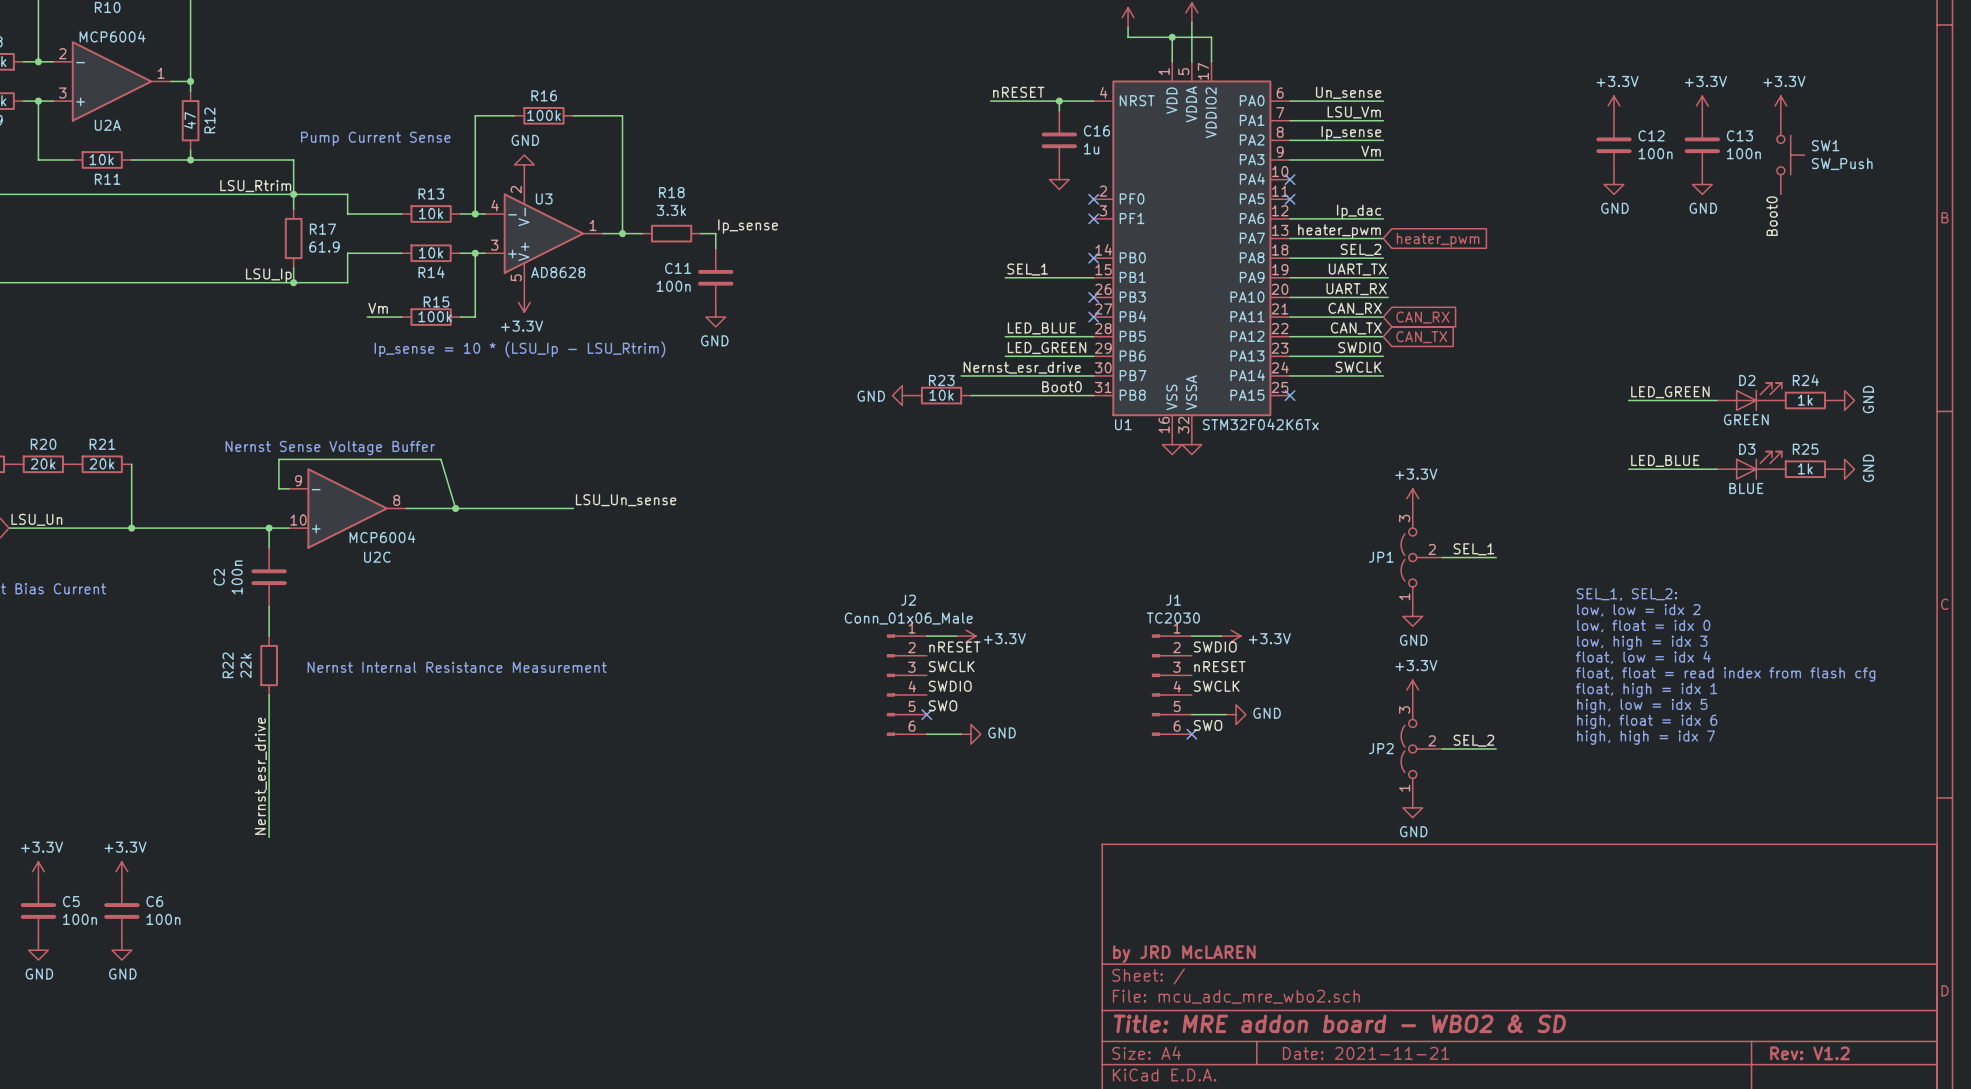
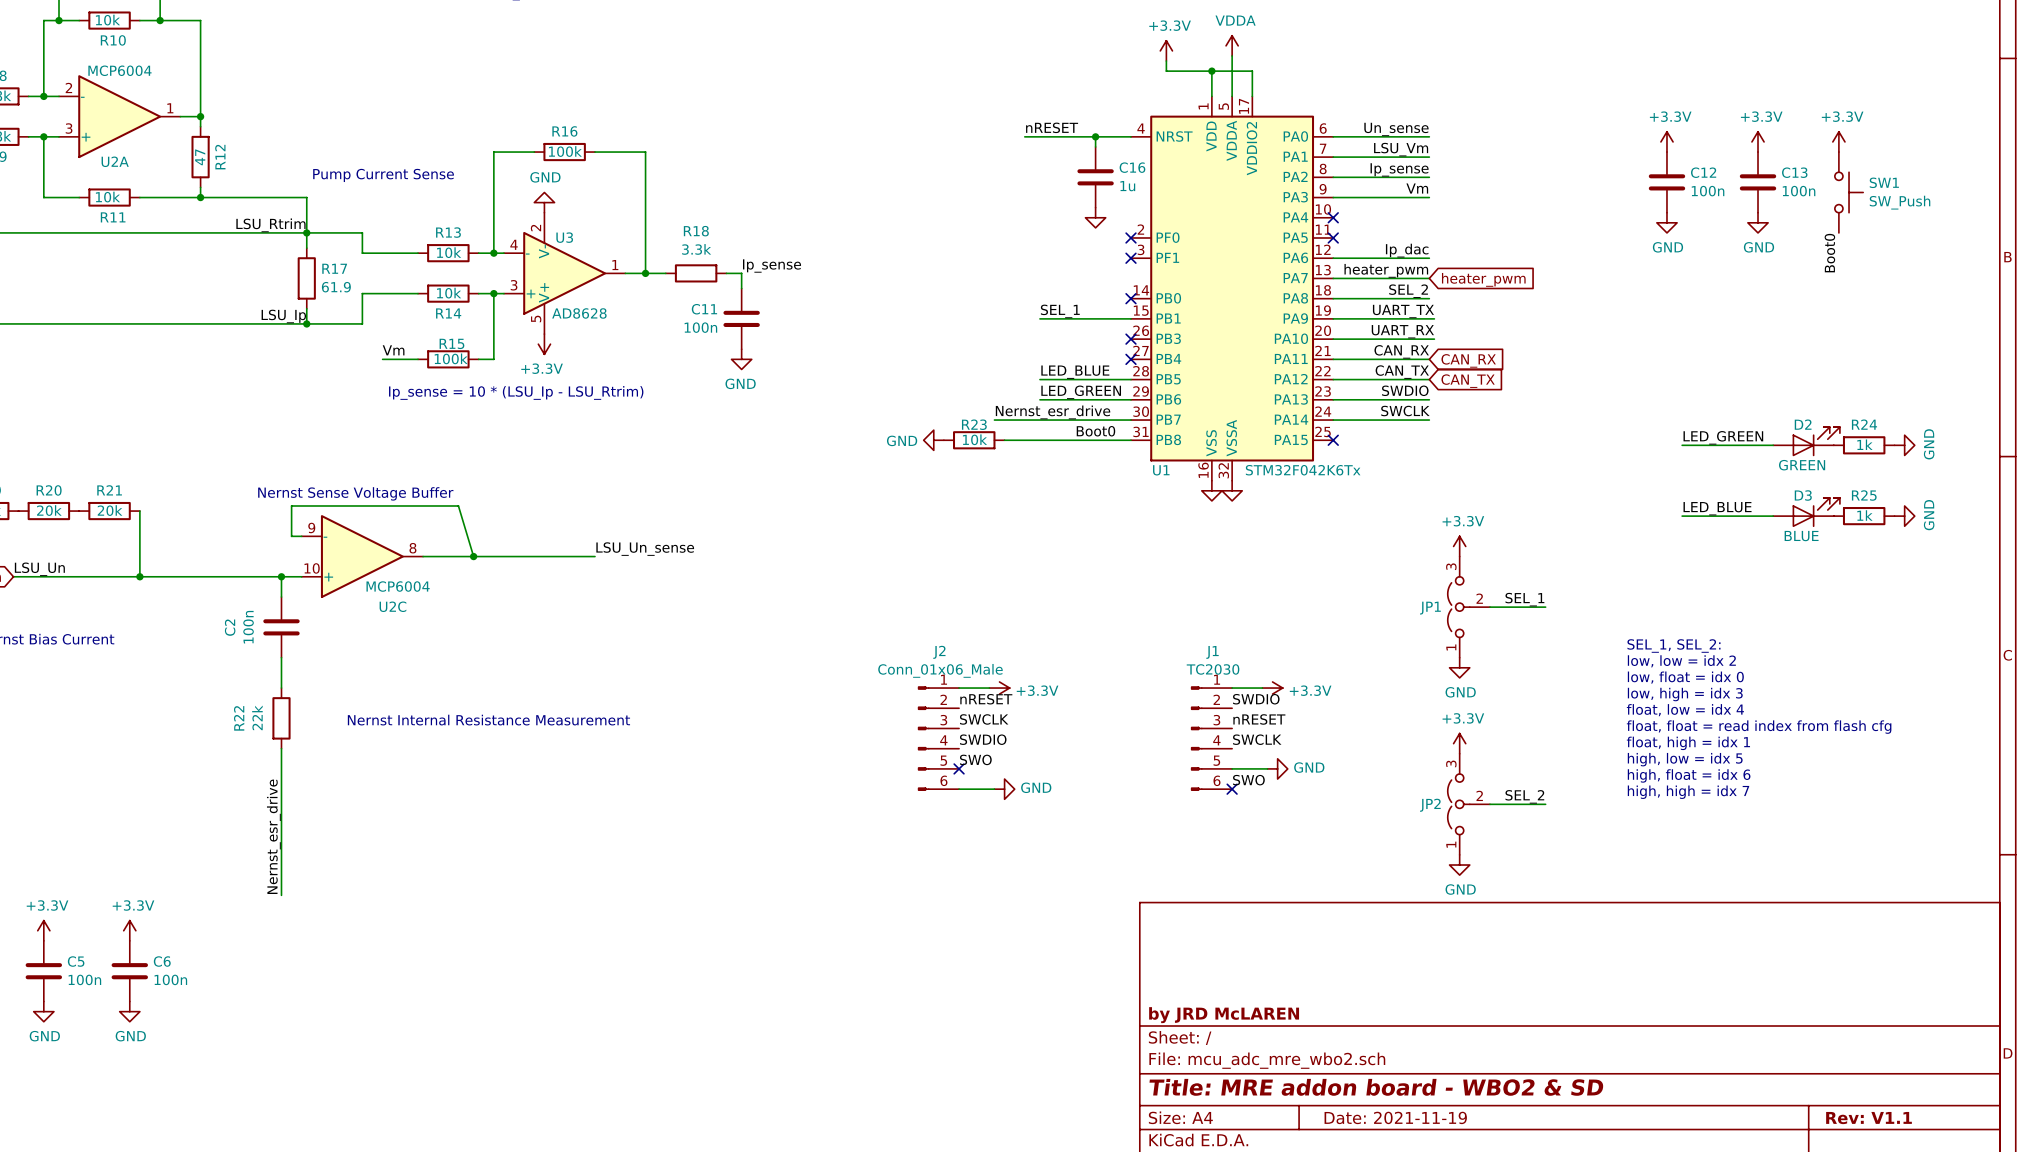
title block: Date: 2021-11-21 (1366, 1053) -> Date: 2021-11-19 (1395, 1117)
title block: Rev: V1.2 (1809, 1053) -> Rev: V1.1 (1869, 1118)

